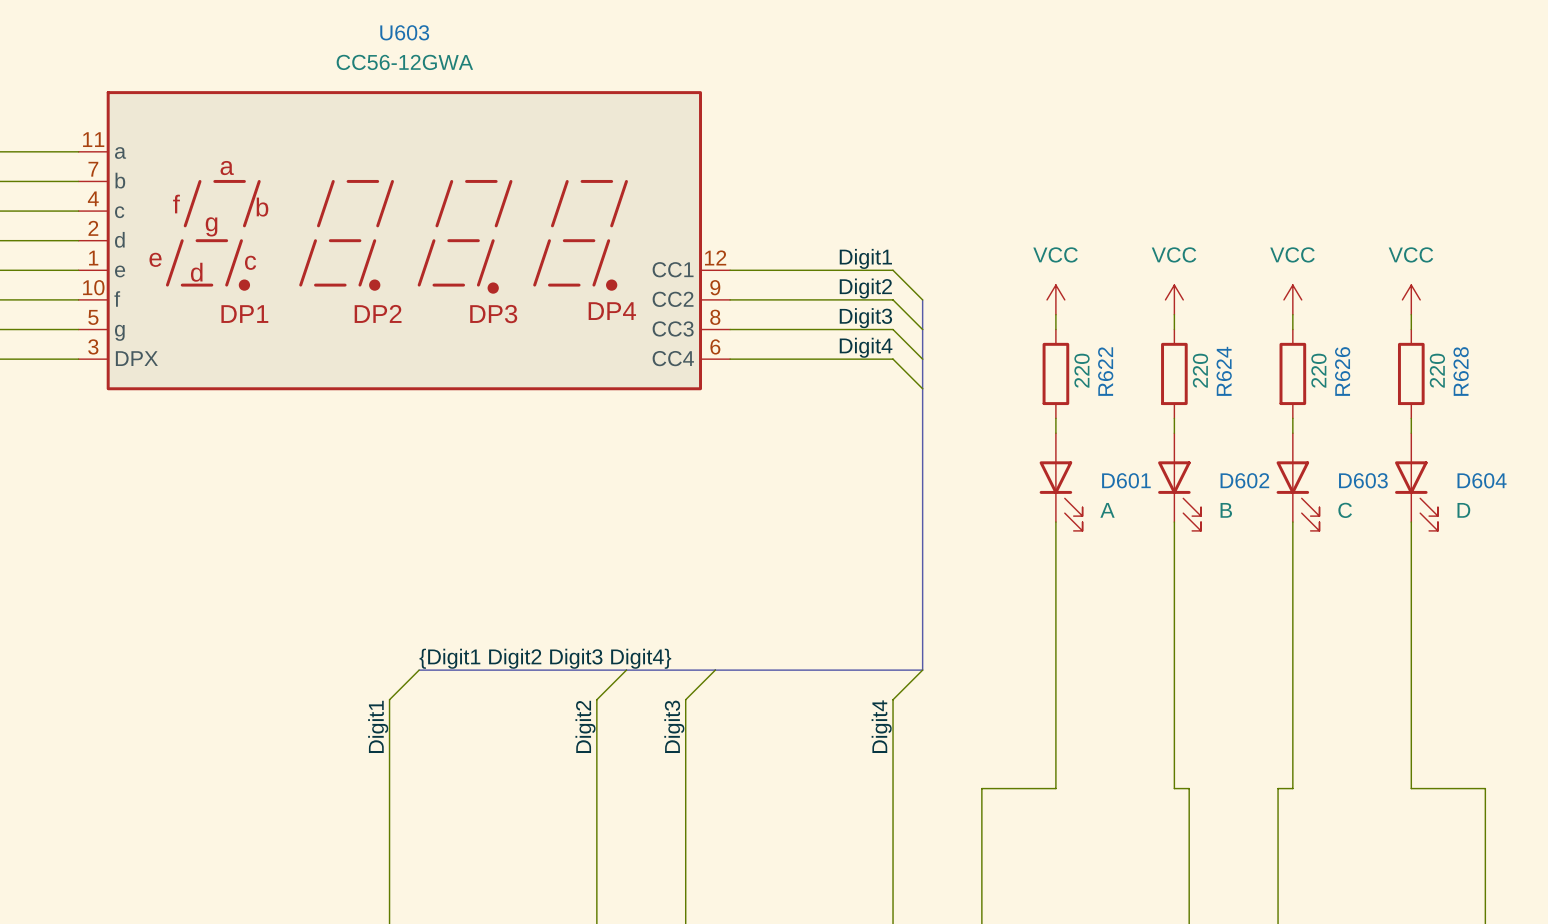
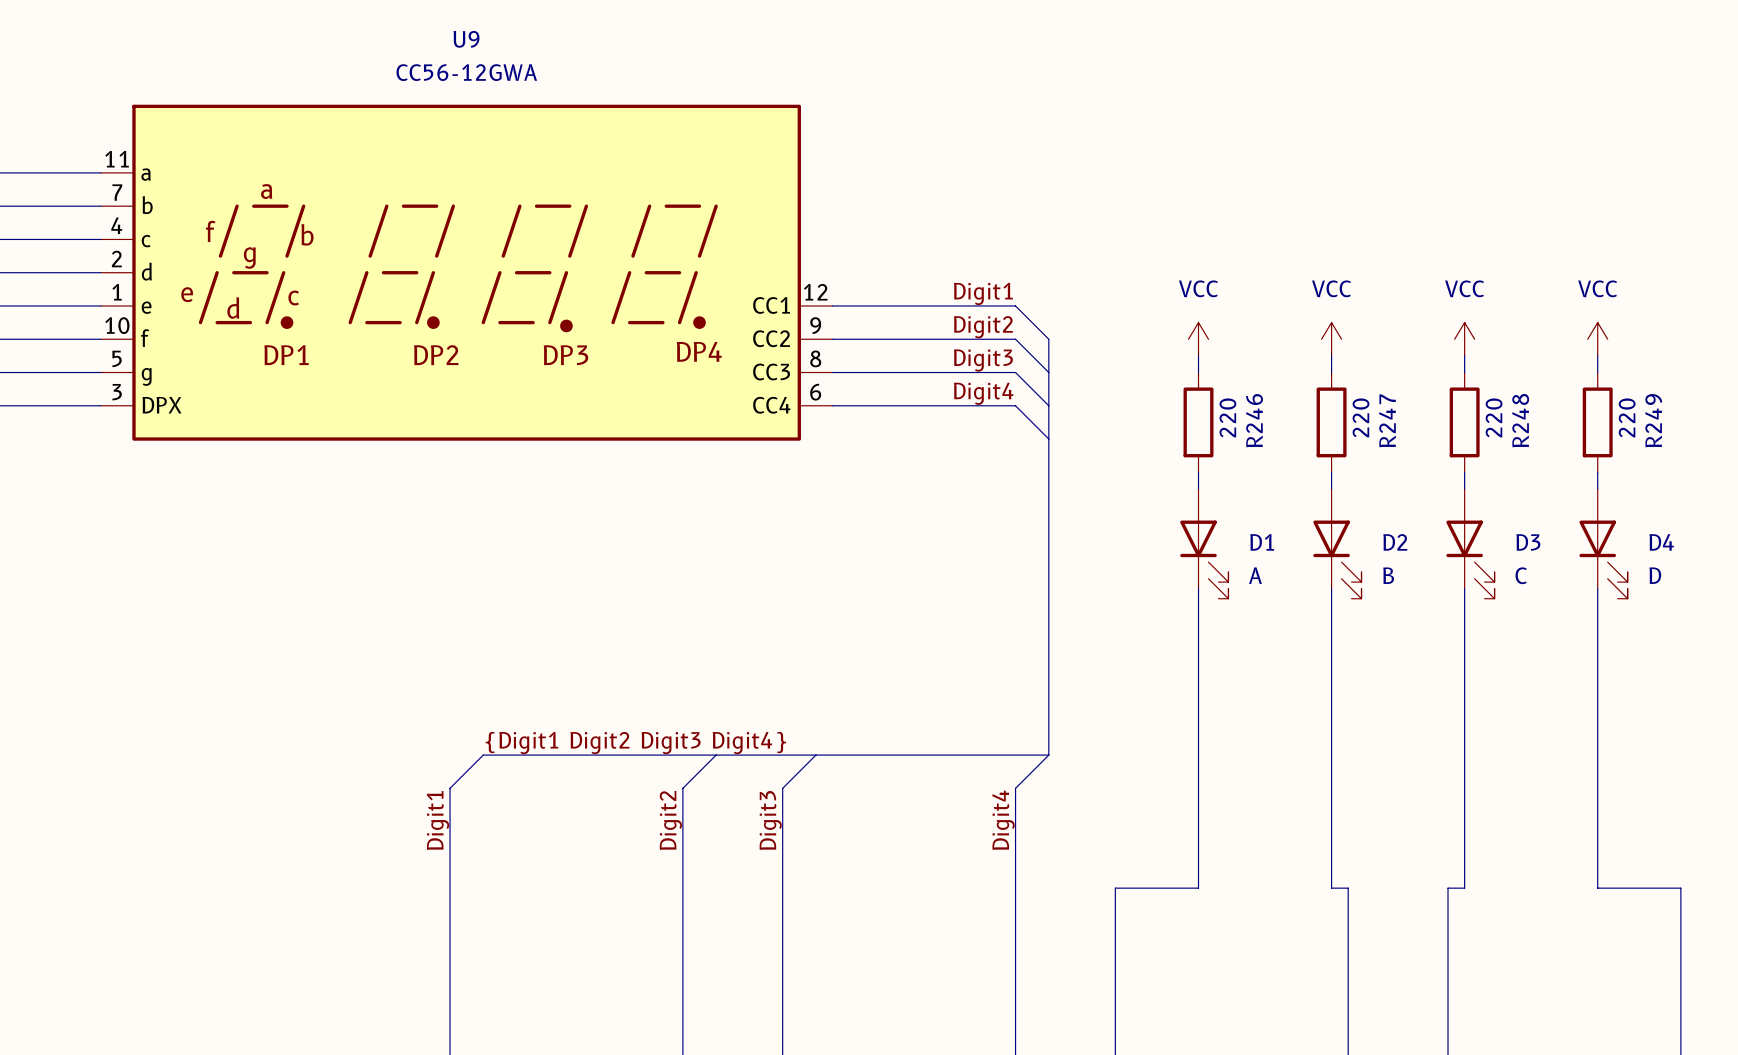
U603 name: U603 (404, 32) -> U9 (466, 39)
R622 name: R622 (1105, 371) -> R246 (1254, 420)
R624 name: R624 (1224, 371) -> R247 (1387, 420)
R626 name: R626 (1342, 371) -> R248 (1520, 420)
R628 name: R628 (1461, 371) -> R249 (1653, 420)
D601 name: D601 (1126, 480) -> D1 (1262, 542)
D602 name: D602 (1244, 480) -> D2 (1395, 542)
D603 name: D603 (1363, 480) -> D3 (1528, 542)
D604 name: D604 (1482, 480) -> D4 (1661, 542)

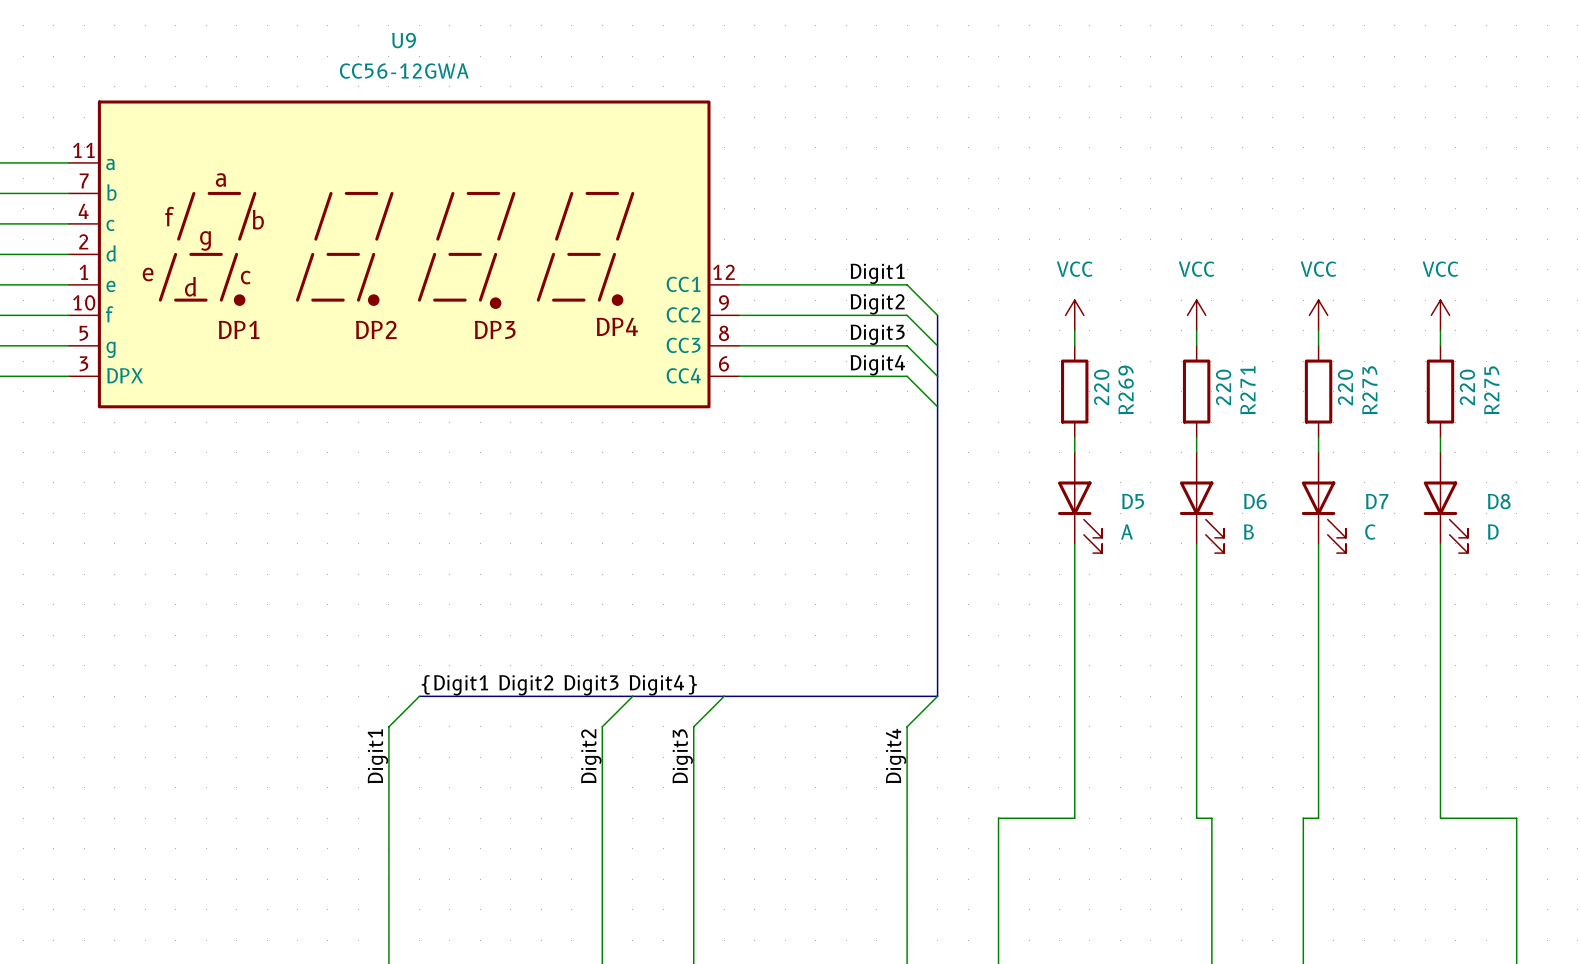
R246 name: R246 (1254, 420) -> R269 (1126, 389)
R247 name: R247 (1387, 420) -> R271 (1247, 390)
R248 name: R248 (1520, 420) -> R273 (1369, 390)
R249 name: R249 (1653, 420) -> R275 (1491, 390)
D1 name: D1 (1262, 542) -> D5 (1133, 501)
D2 name: D2 (1395, 542) -> D6 (1255, 501)
D3 name: D3 (1528, 542) -> D7 (1377, 501)
D4 name: D4 (1661, 542) -> D8 (1499, 501)

